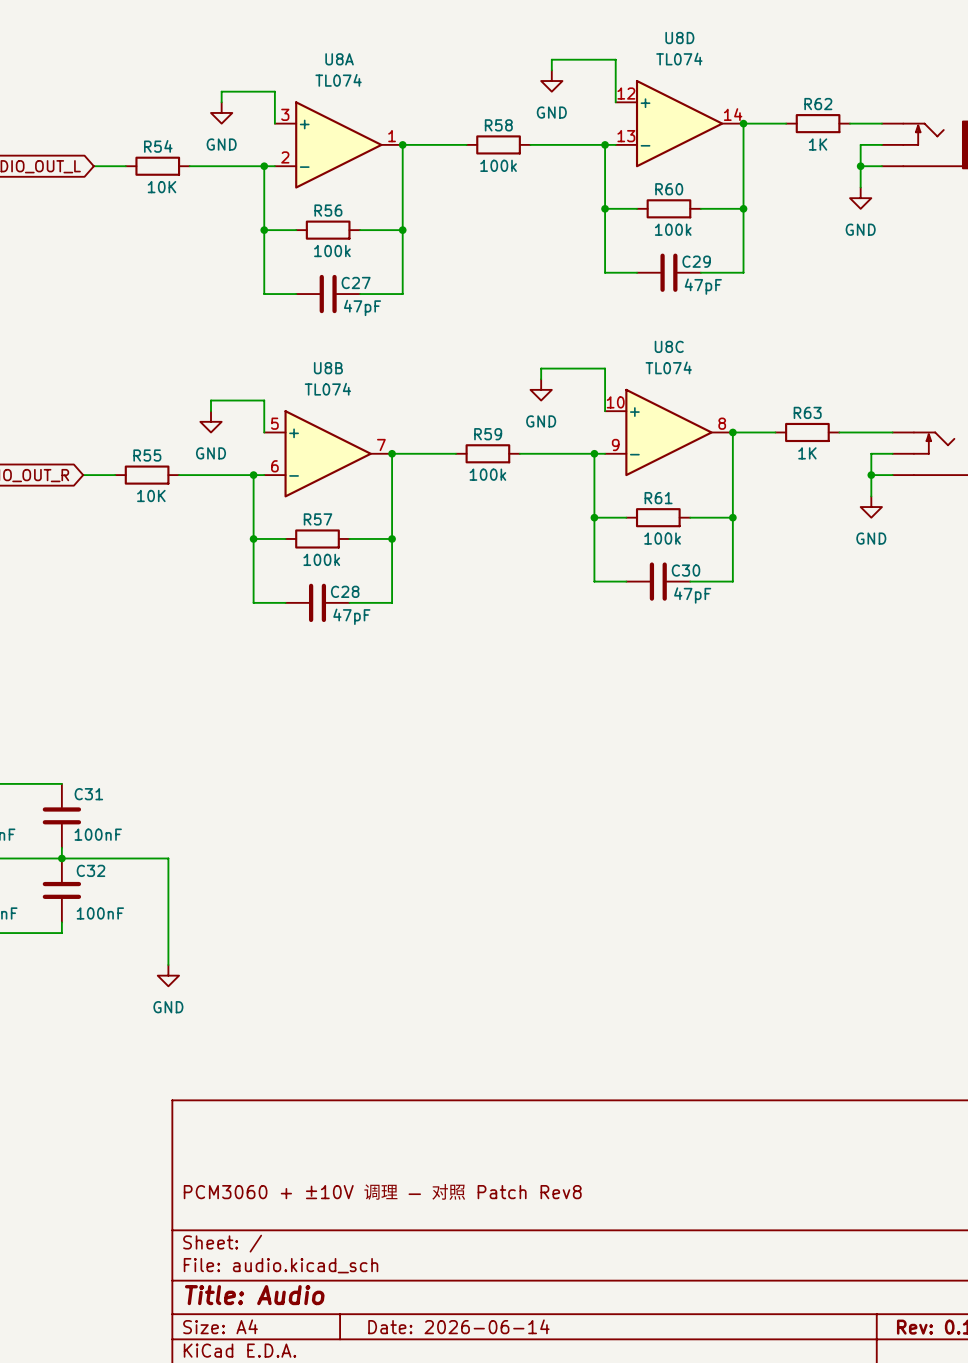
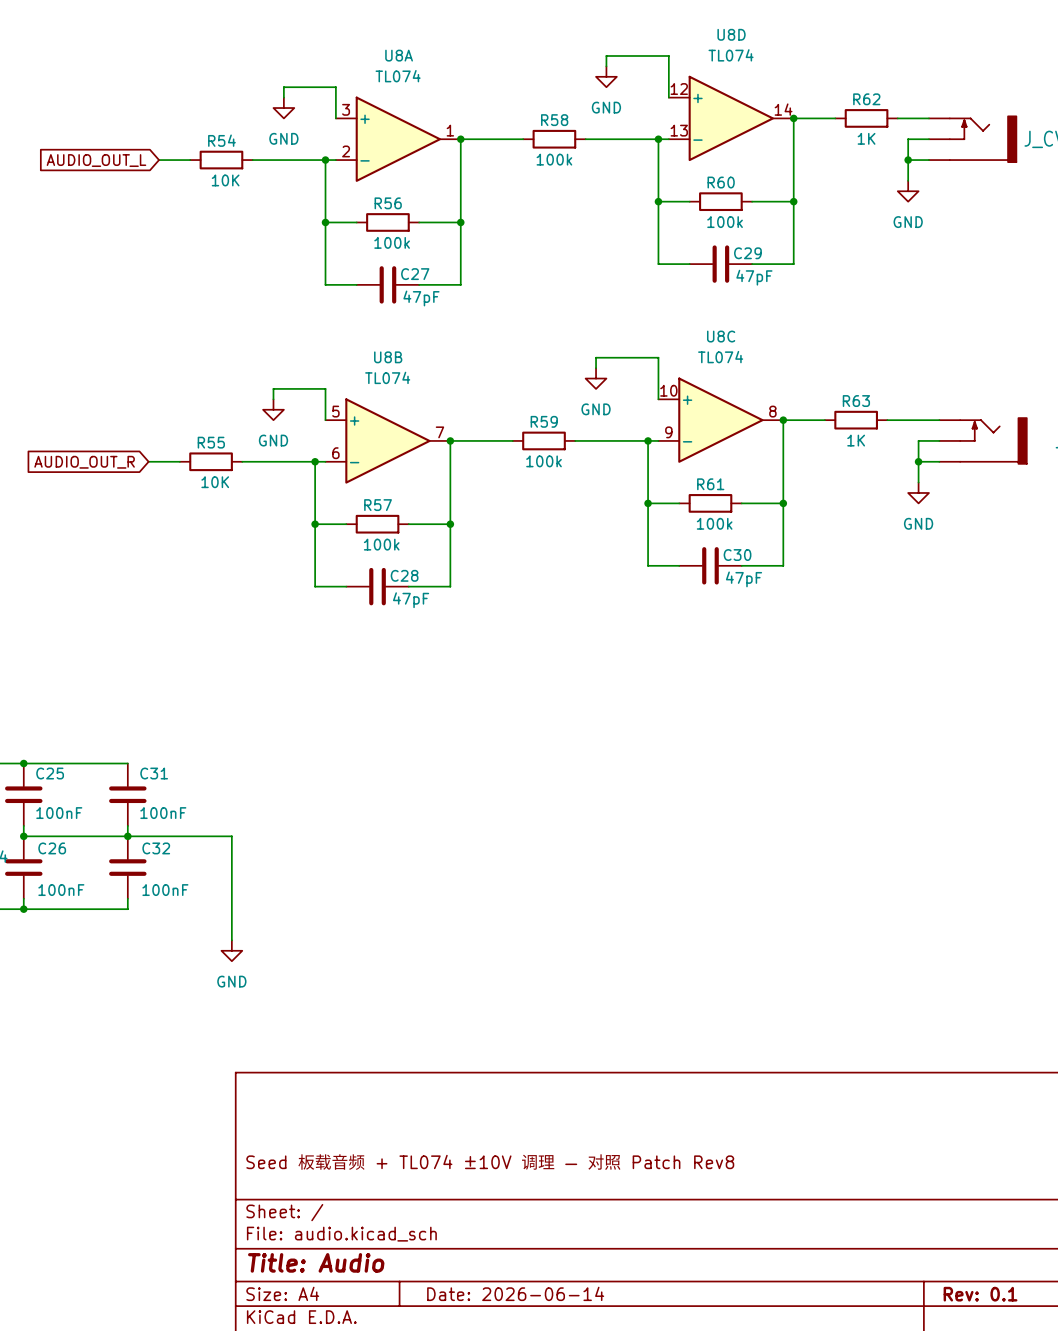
title block: PCM3060 + ±10V 调理 — 对照 Patch Rev8 (382, 1191) -> Seed 板载音频 + TL074 ±10V 调理 — 对照 Patch Rev8 (490, 1162)

